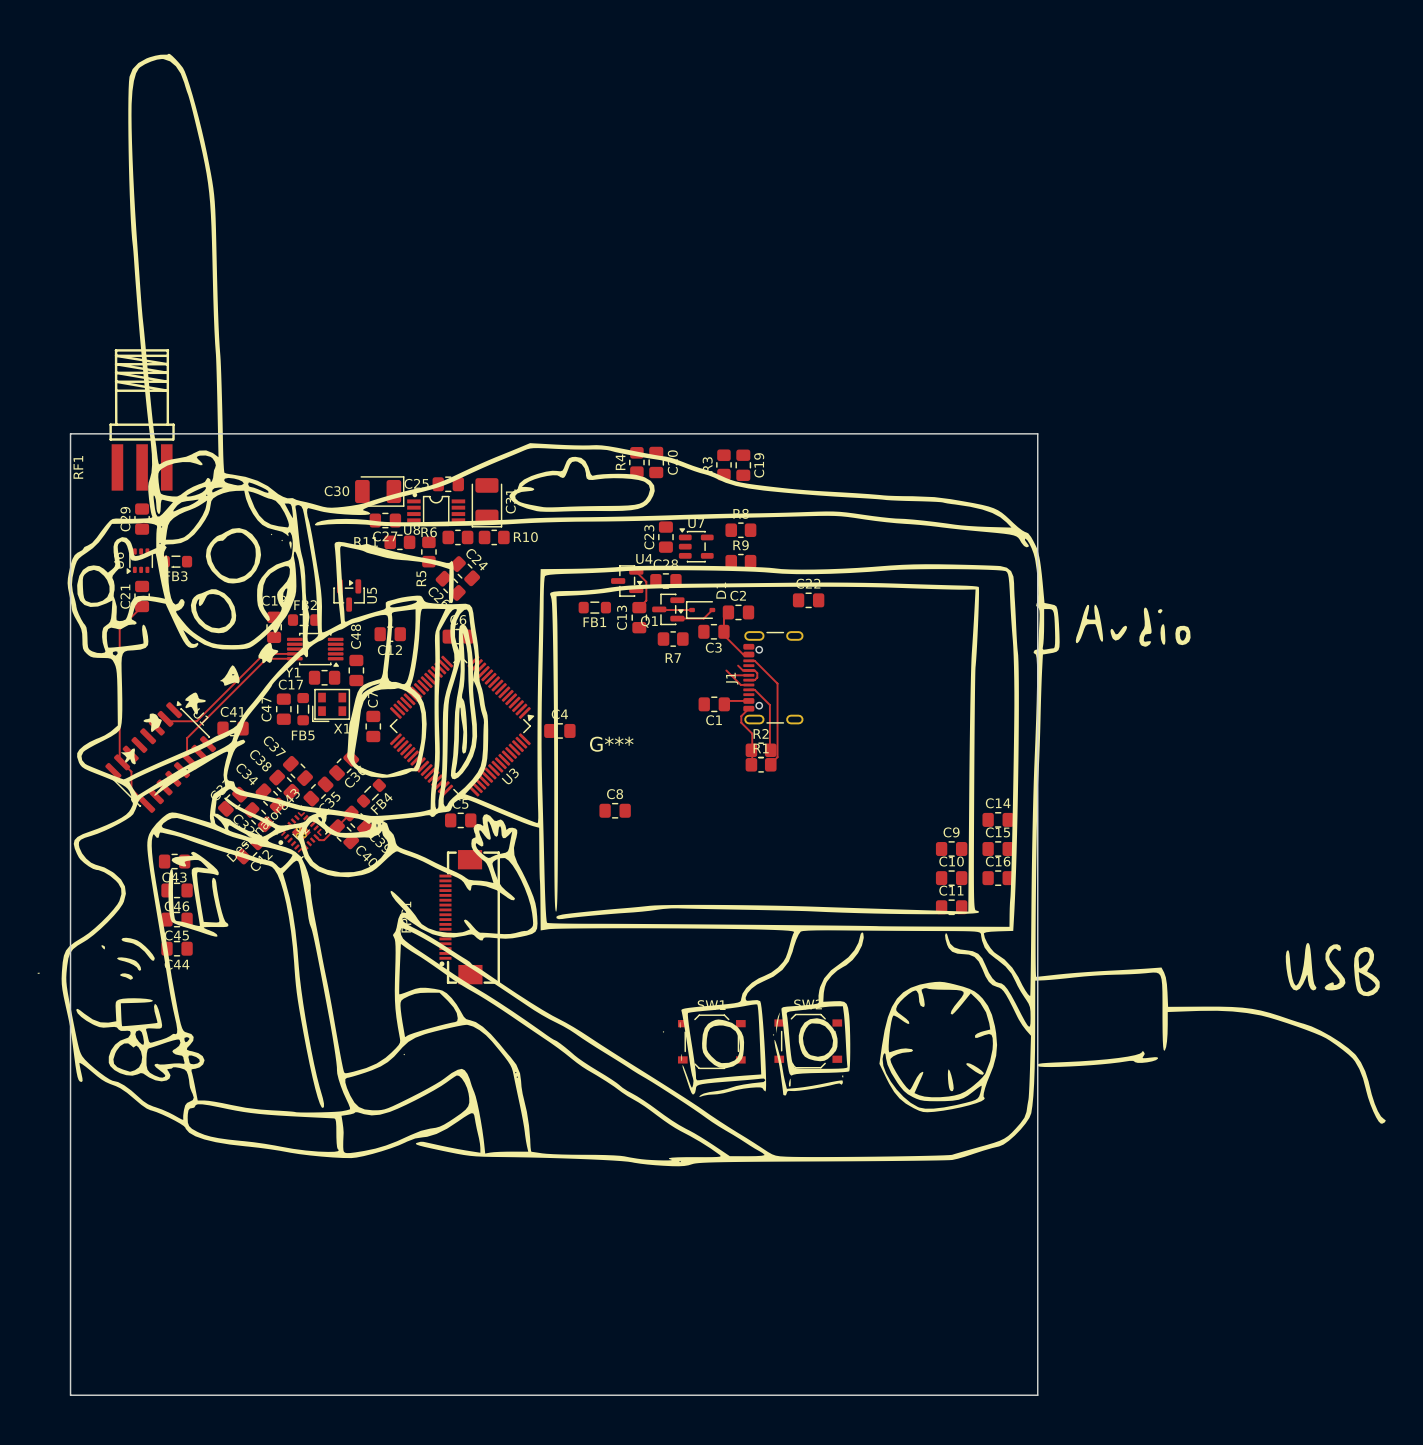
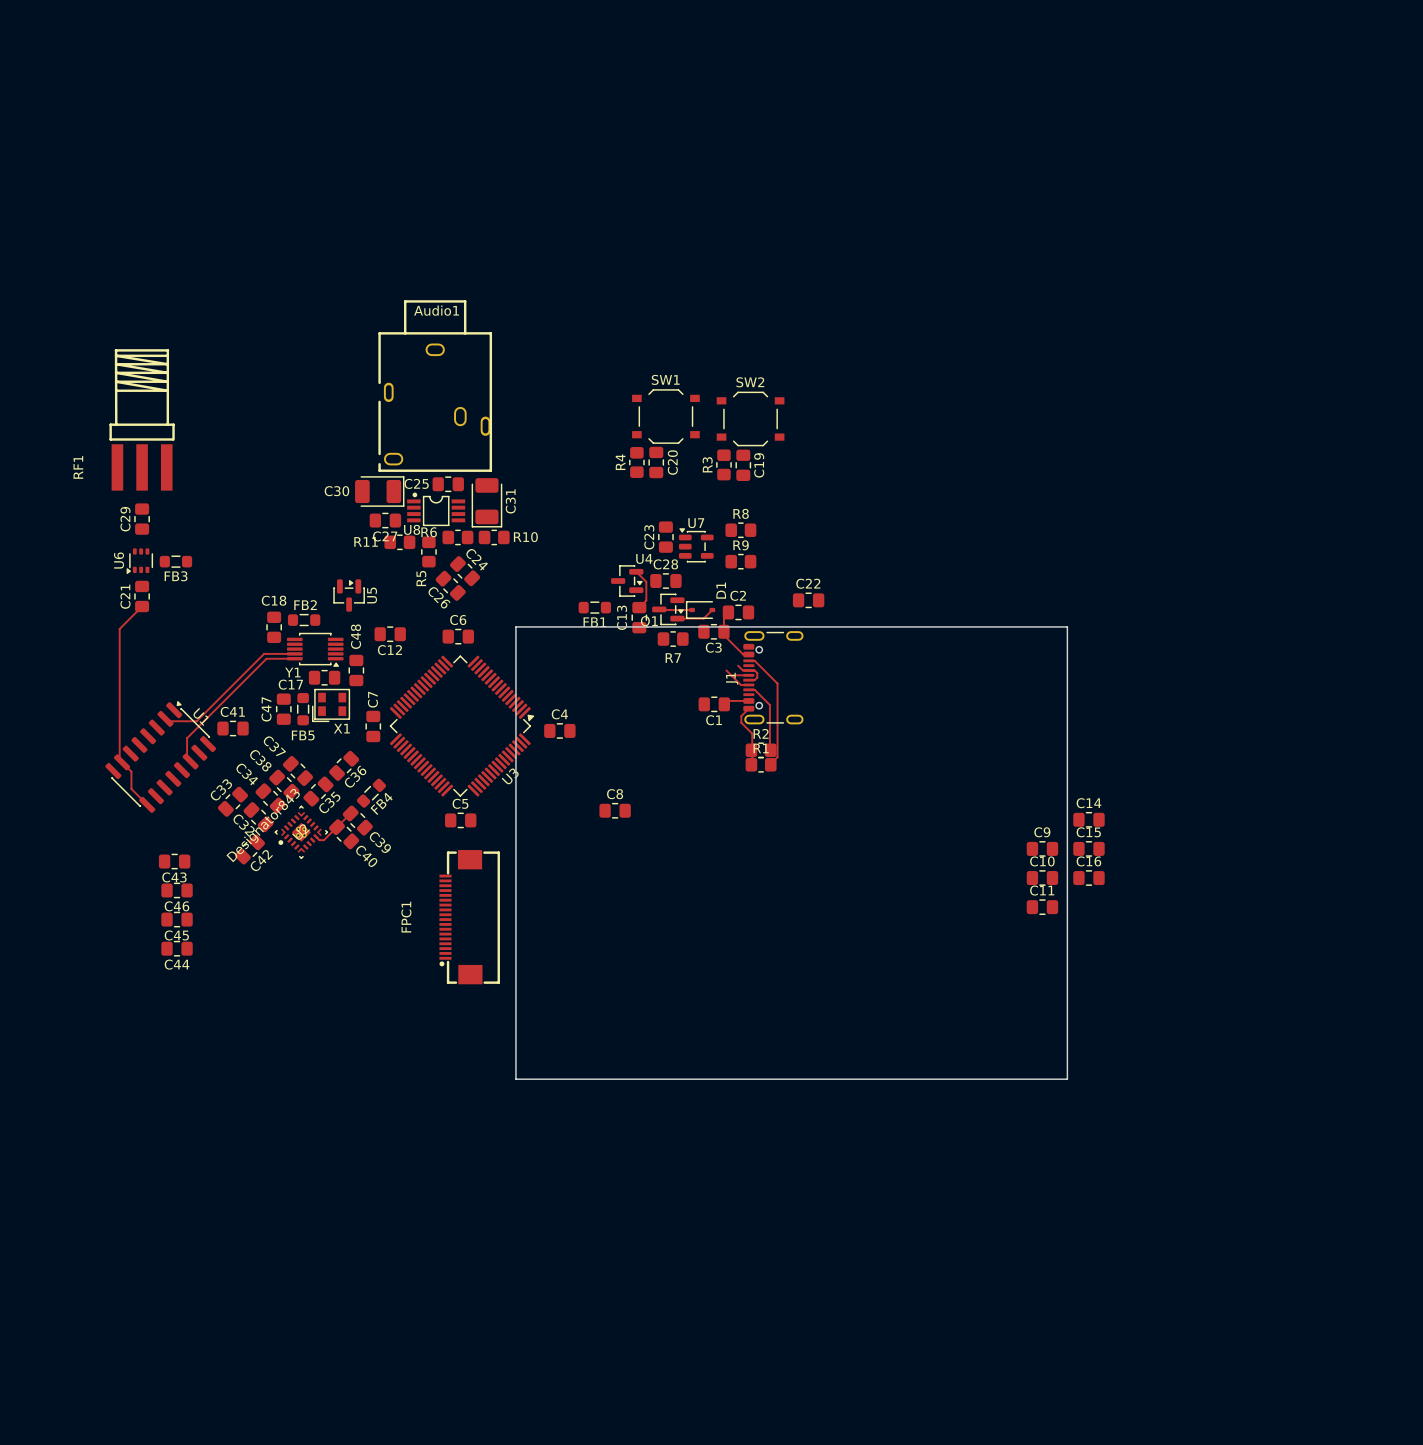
Audio1: none -> (435, 386)
board edge: (70, 433) (1037, 433) (1037, 1395) (70, 1395) (70, 433) -> none
G***: (711, 610) -> none
board edge: none -> (515, 626) (1067, 626) (1067, 1079) (515, 1079) (515, 626)
C14 position: (998, 819) -> (1088, 819)
C9 position: (951, 849) -> (1042, 848)
C15 position: (998, 849) -> (1088, 848)
C10 position: (951, 878) -> (1042, 878)
C16 position: (998, 878) -> (1088, 878)
C11 position: (951, 907) -> (1042, 907)
SW1 position: (711, 1041) -> (665, 416)
SW2 position: (808, 1041) -> (750, 418)

